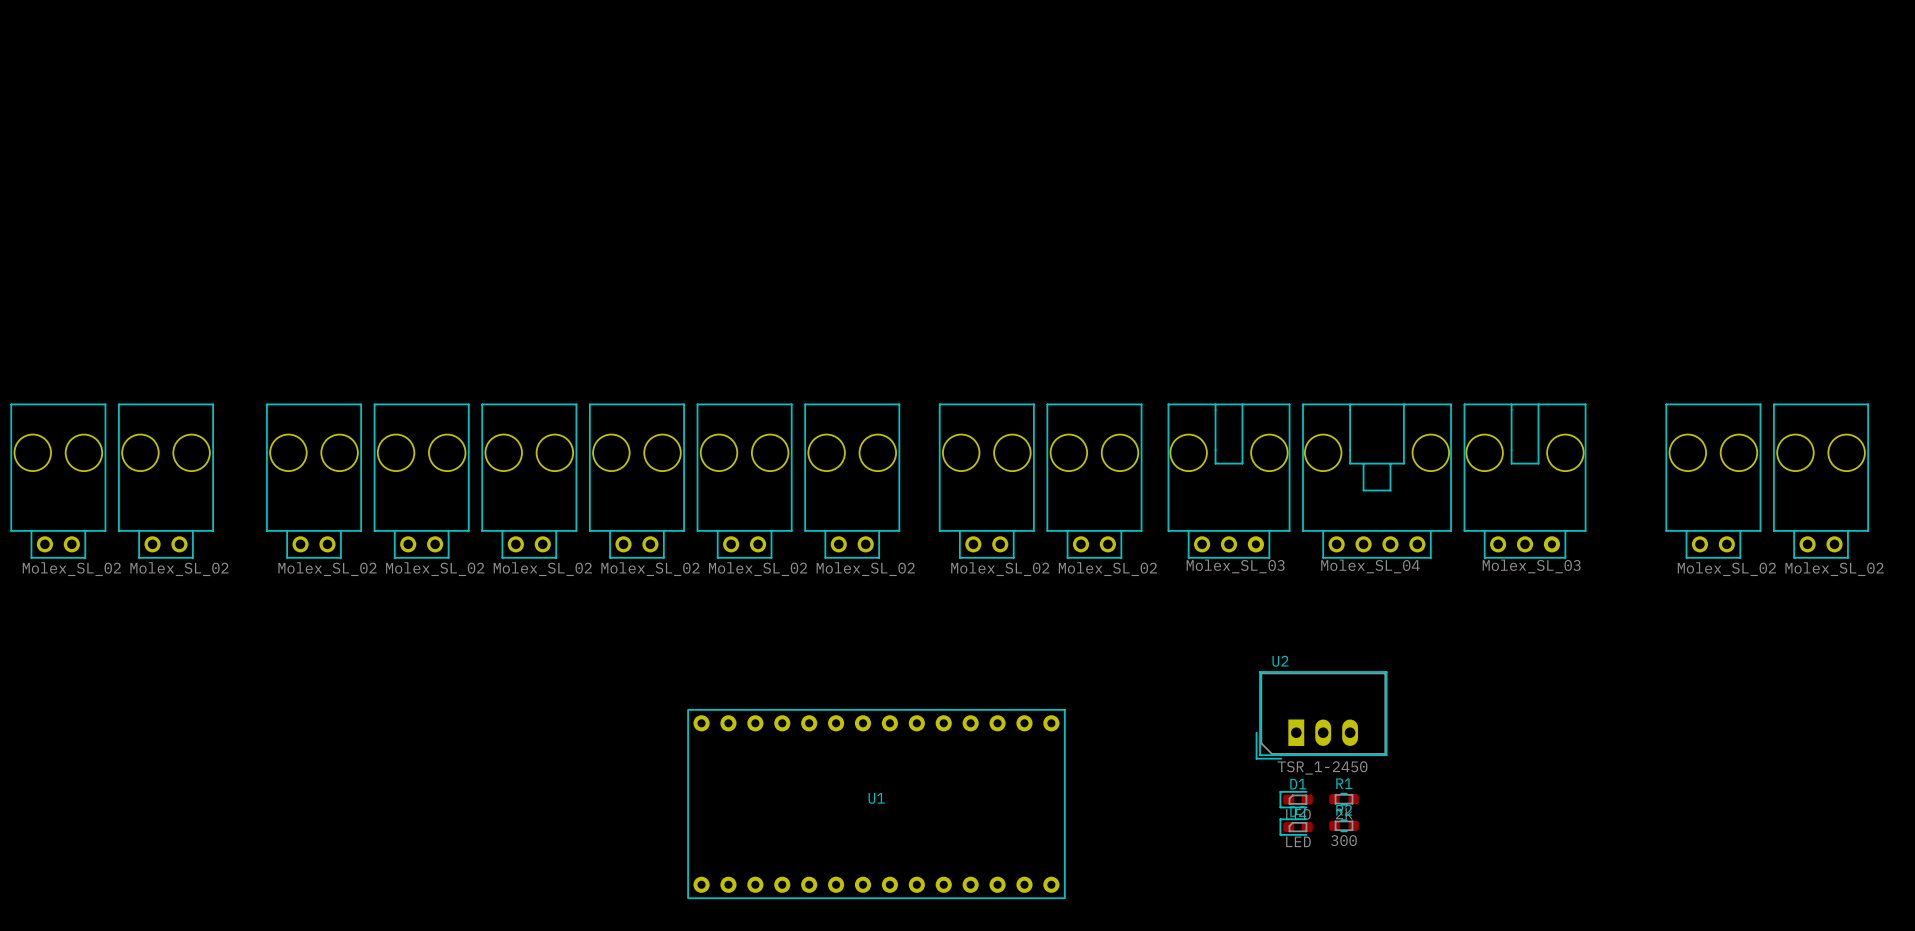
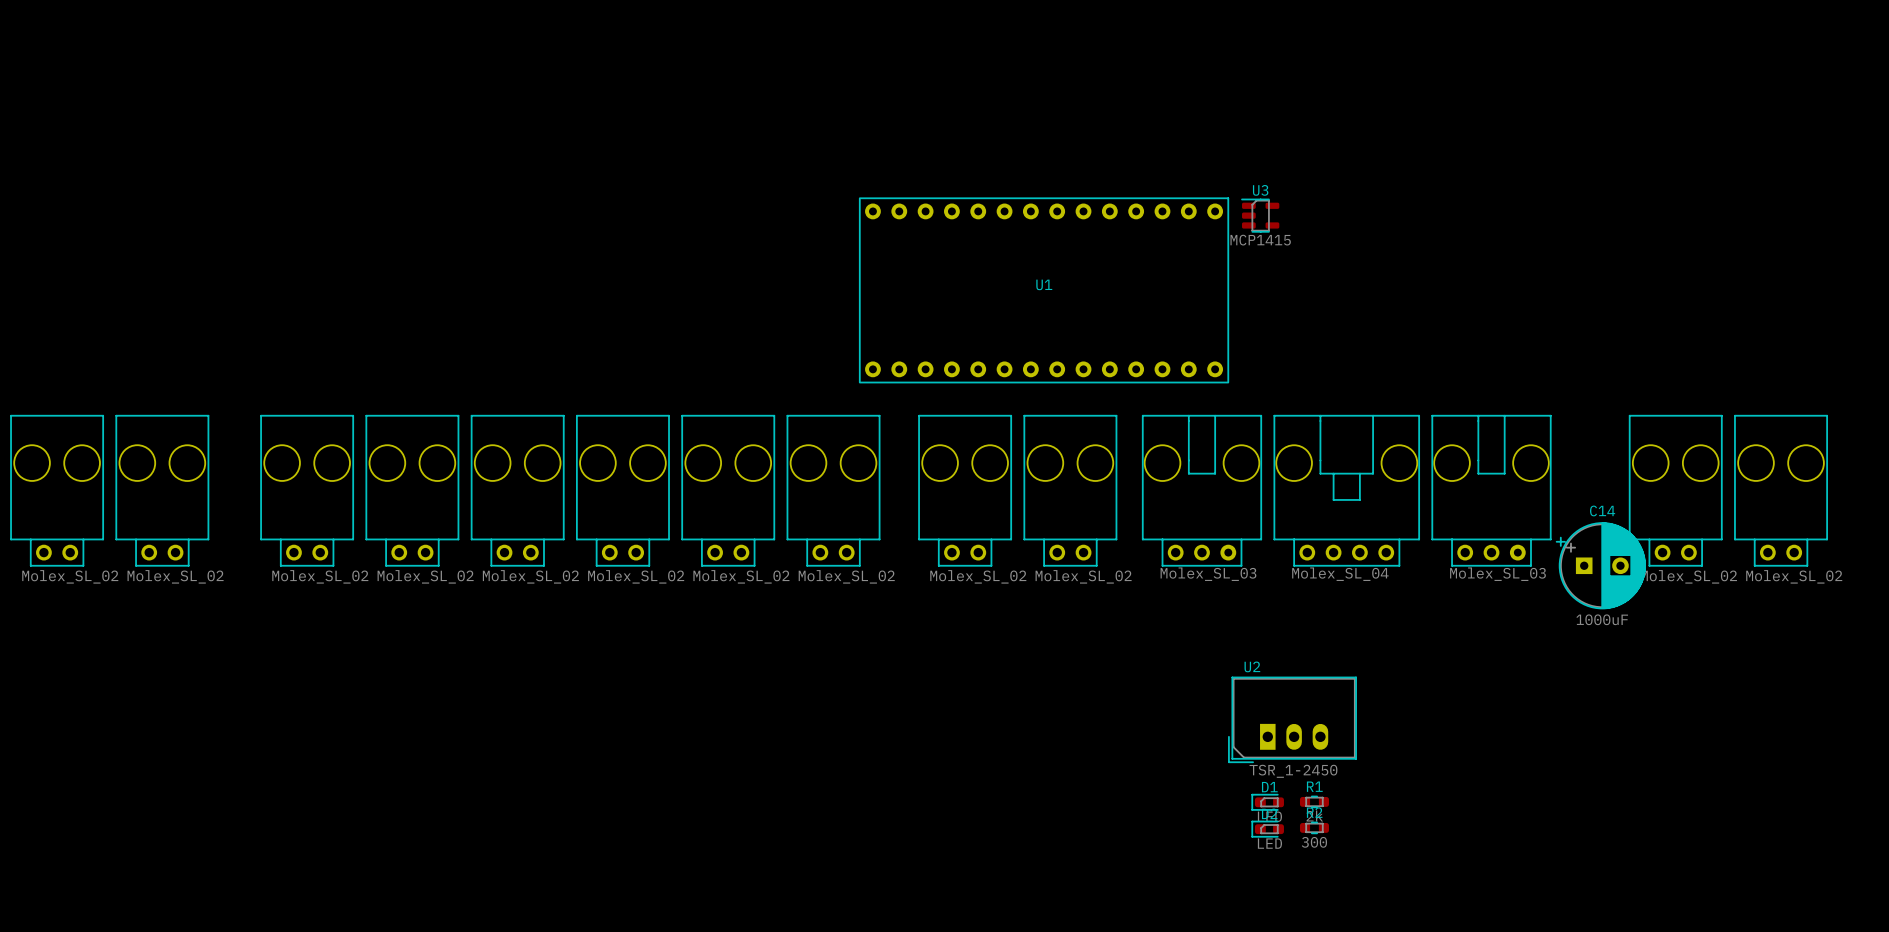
U3: none -> MCP1415 (1260, 215)
C14: none -> 1000uF (1600, 565)
U1 position: (876, 804) -> (1044, 290)

